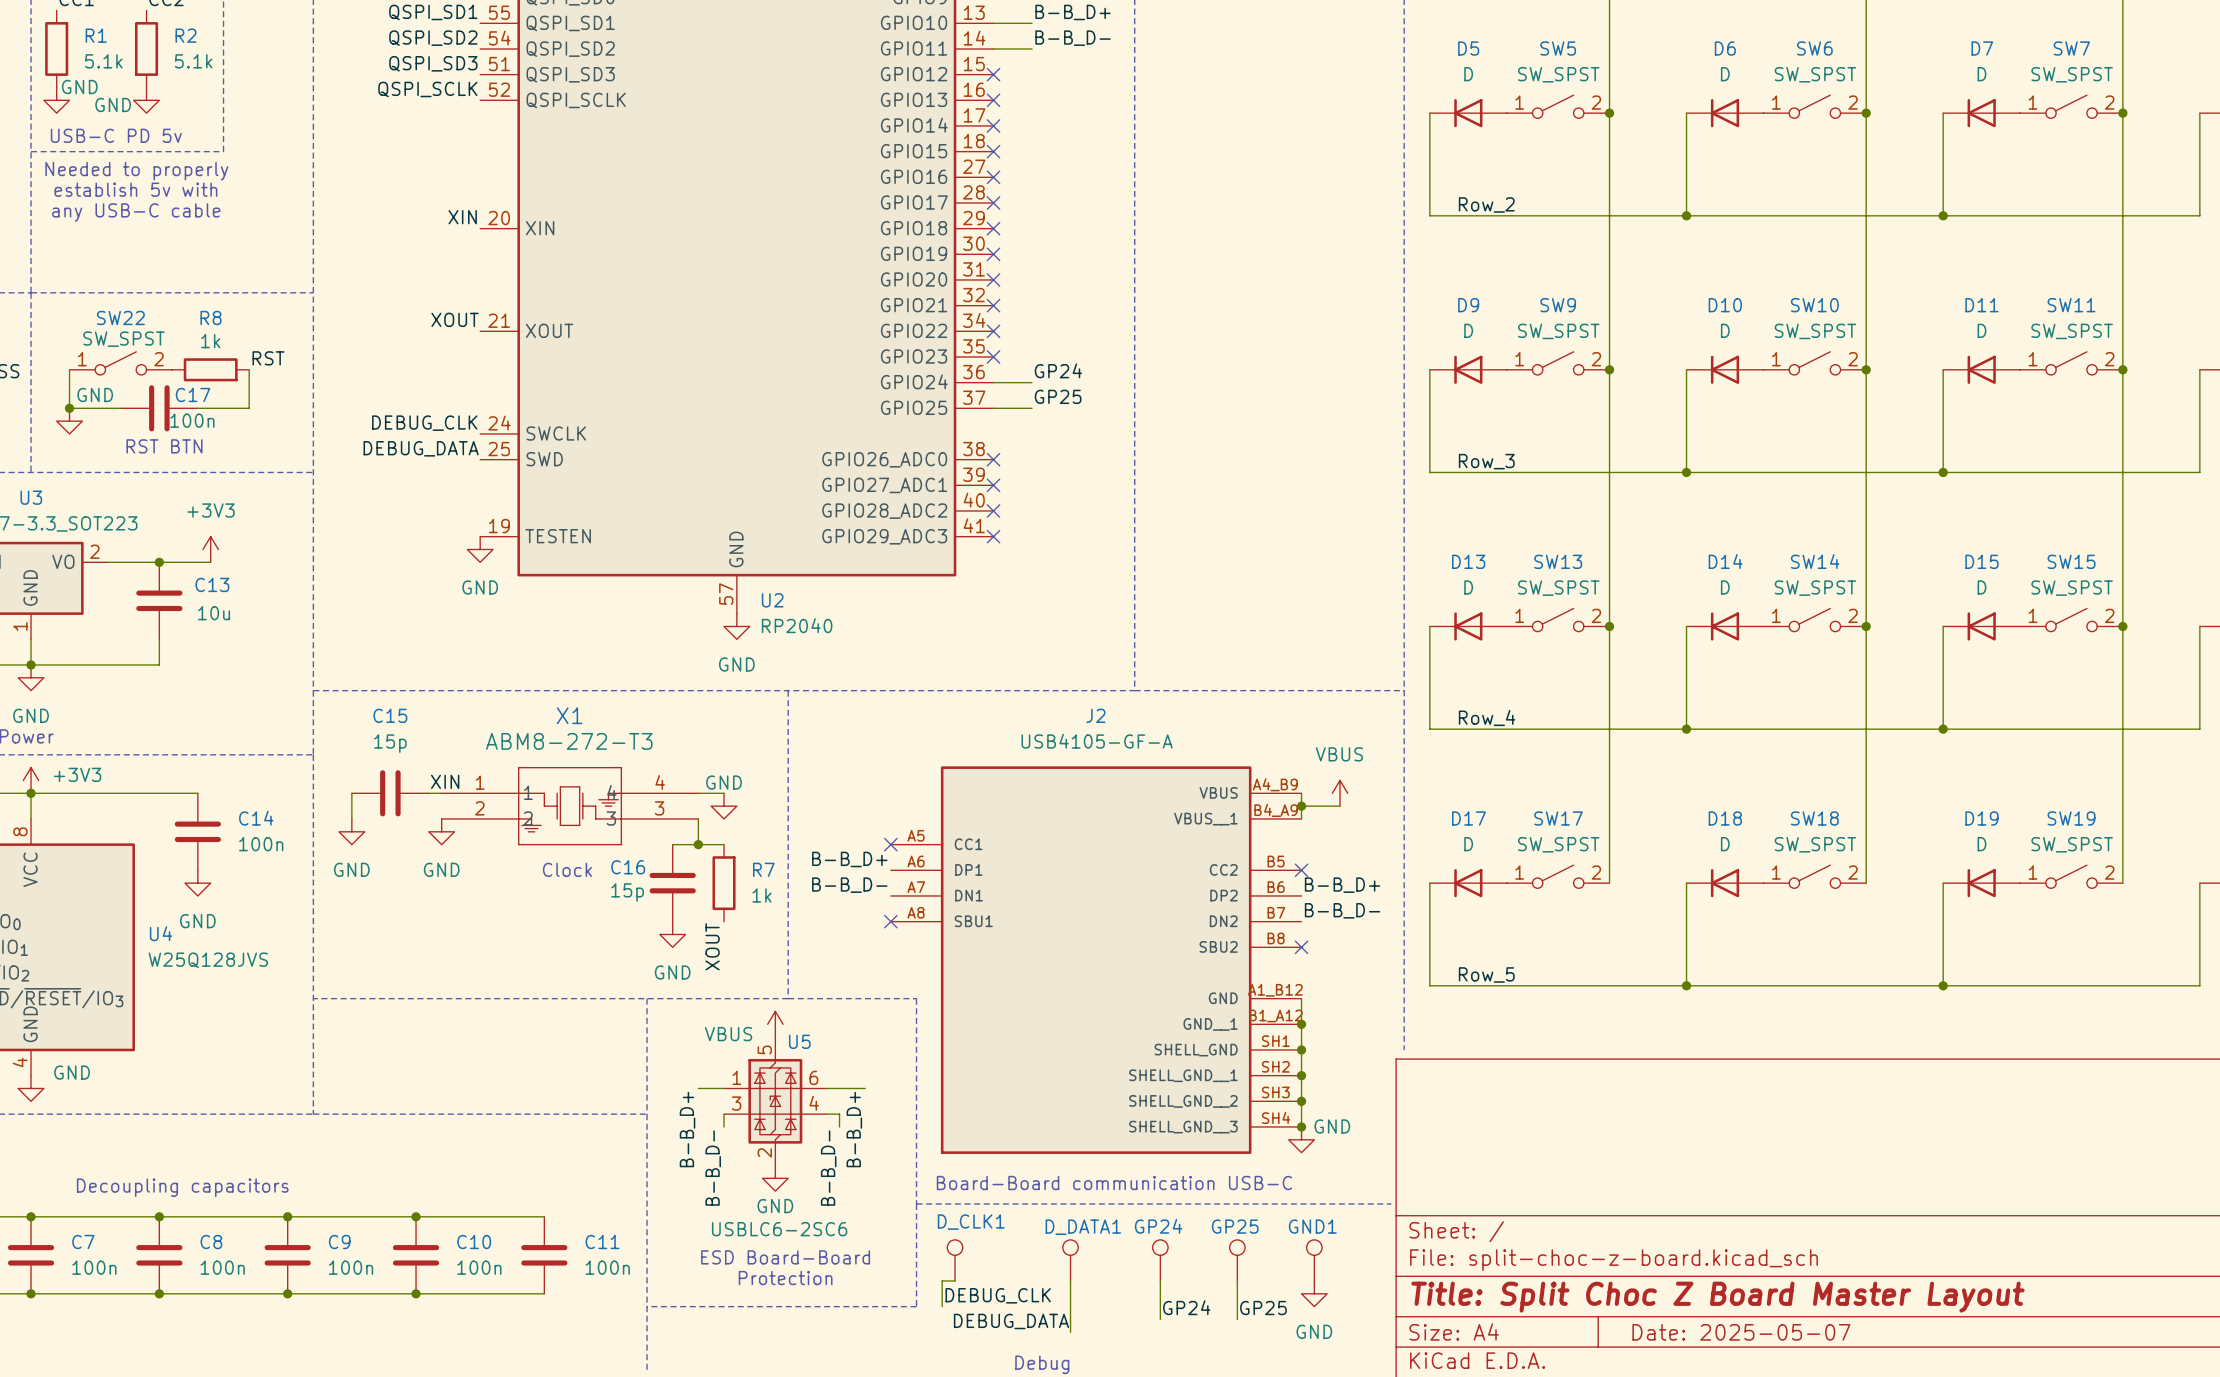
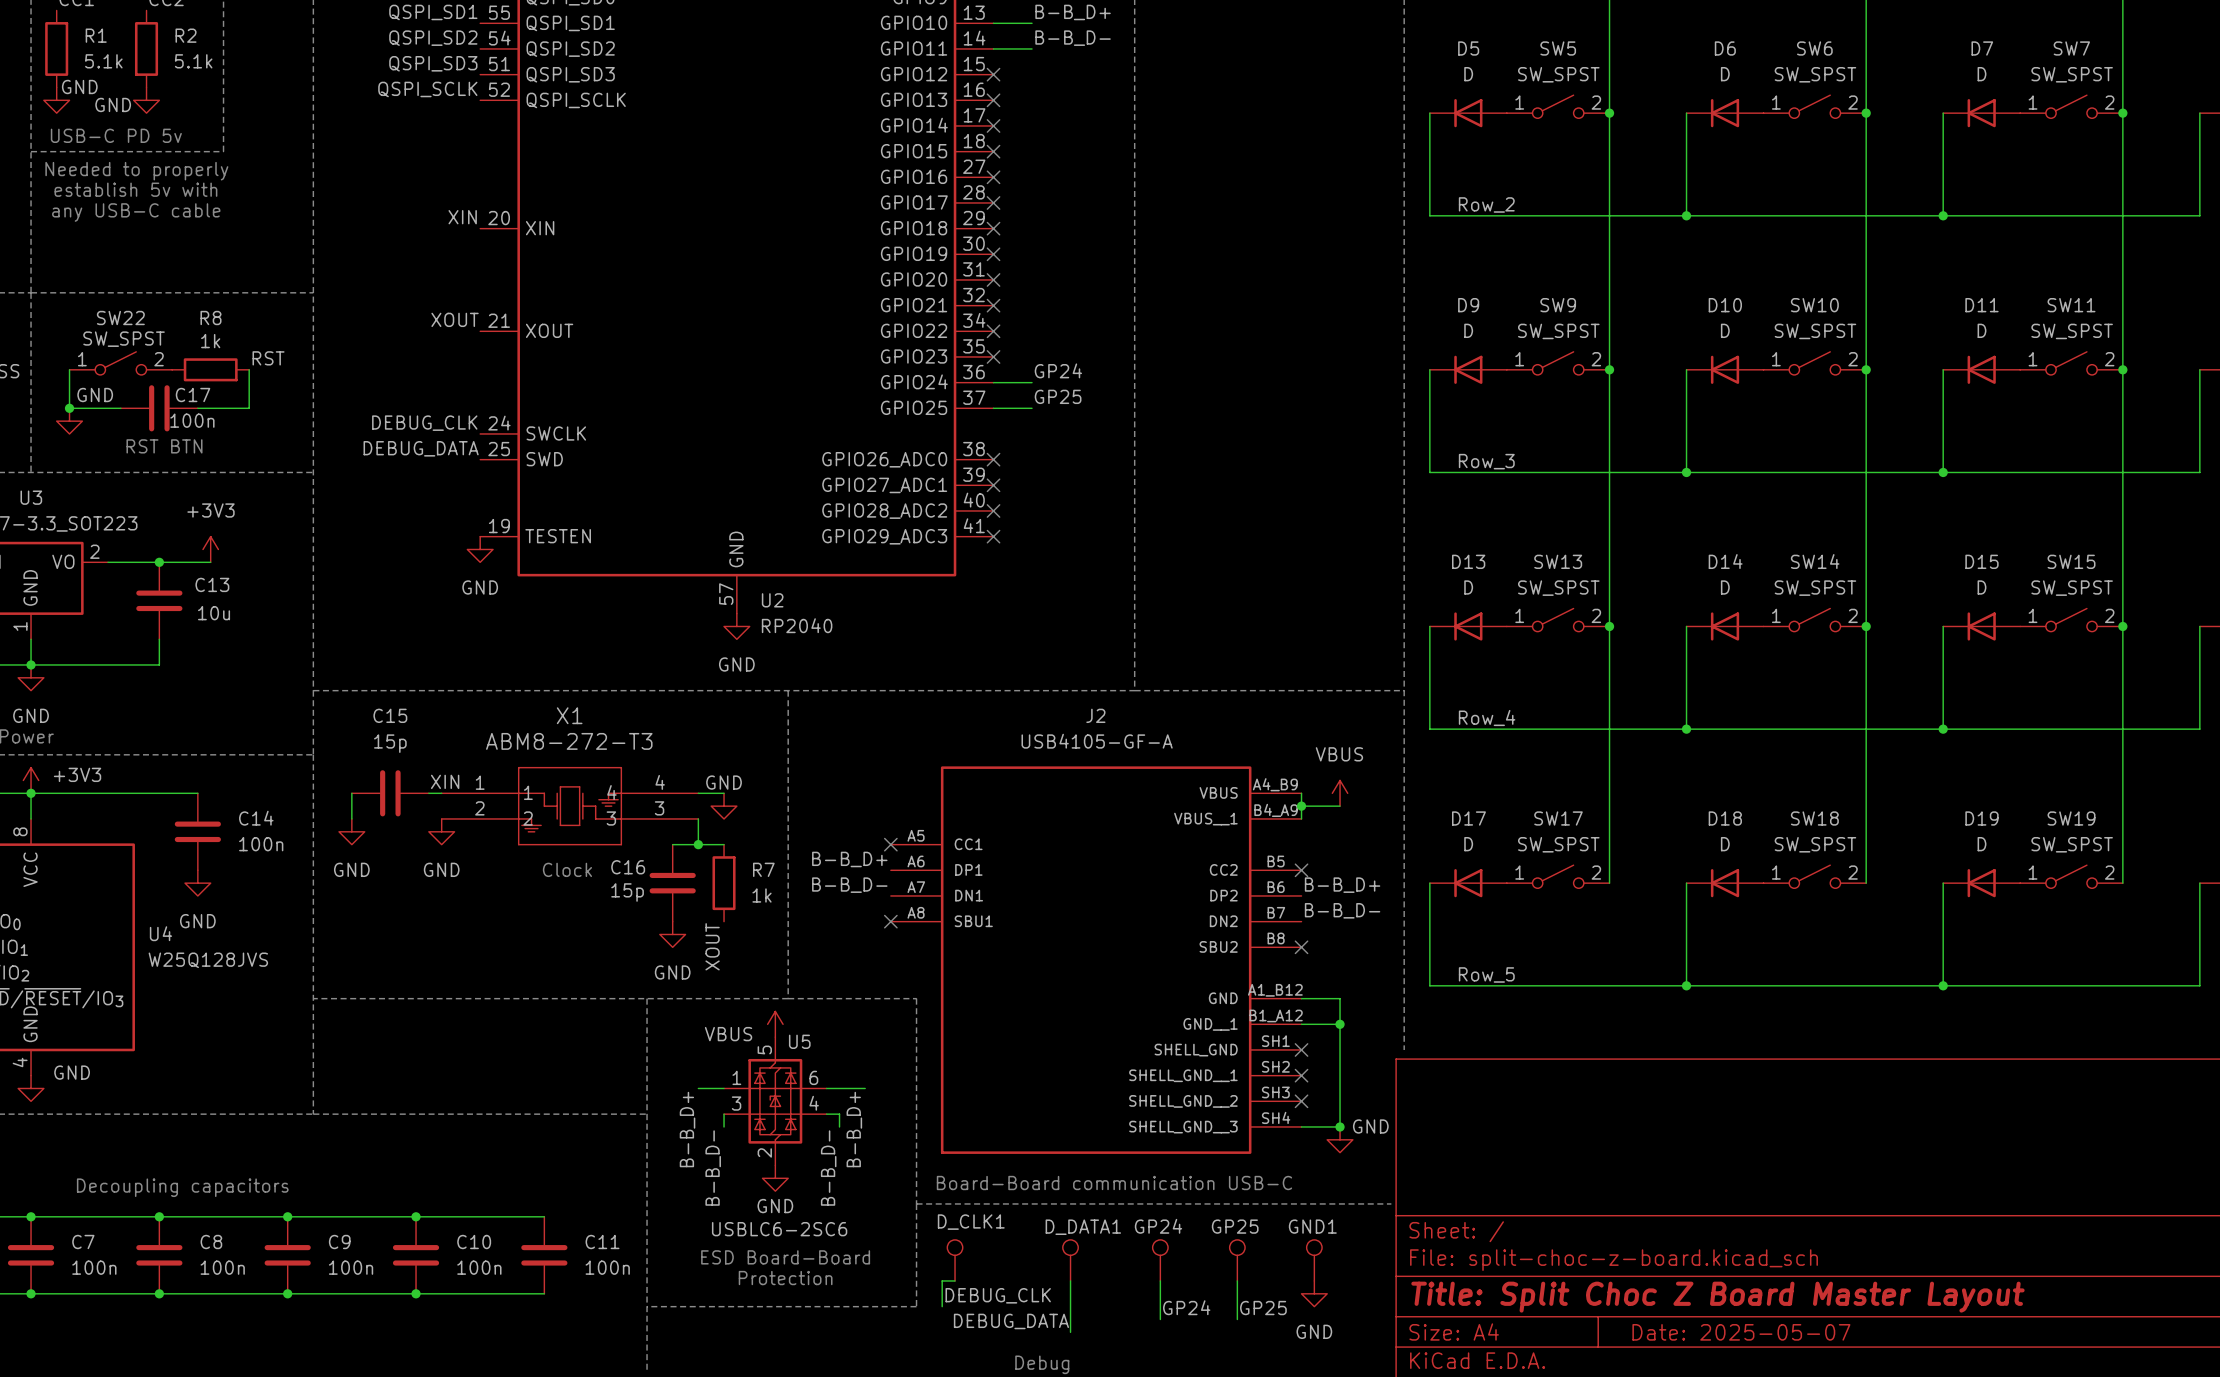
wire: (1301, 998) (1301, 1126) -> (1301, 998) (1340, 998) (1340, 1126) (1301, 1126)
wire: none -> (1301, 1024) (1340, 1024)
junction: (1301, 1024) -> none
junction: none -> (1340, 1024)
junction: (1301, 1049) -> none
no-connect mark: none -> (1301, 1049)
junction: (1301, 1075) -> none
no-connect mark: none -> (1301, 1075)
junction: (1301, 1101) -> none
no-connect mark: none -> (1301, 1101)
junction: (1301, 1126) -> none
junction: none -> (1340, 1126)
power symbol position: GND (1301, 1139) -> GND (1340, 1139)

